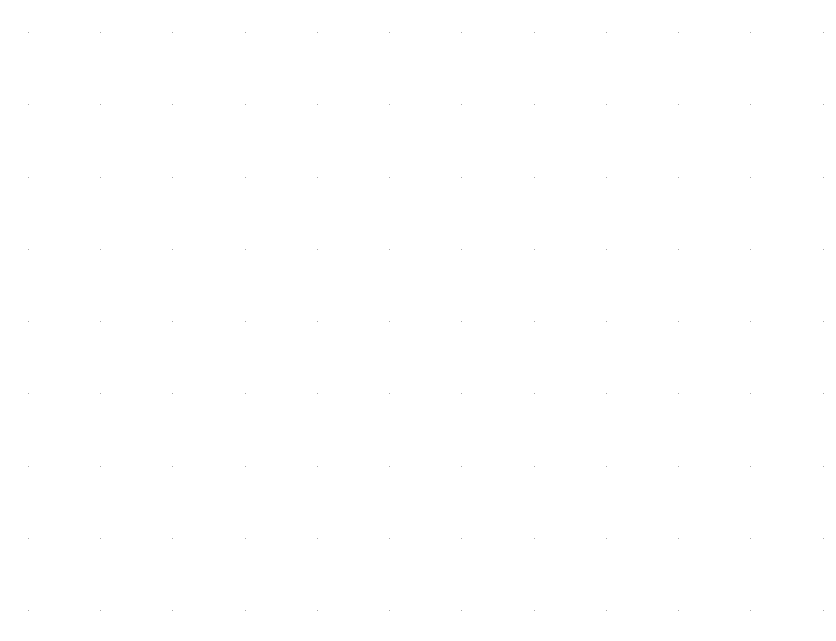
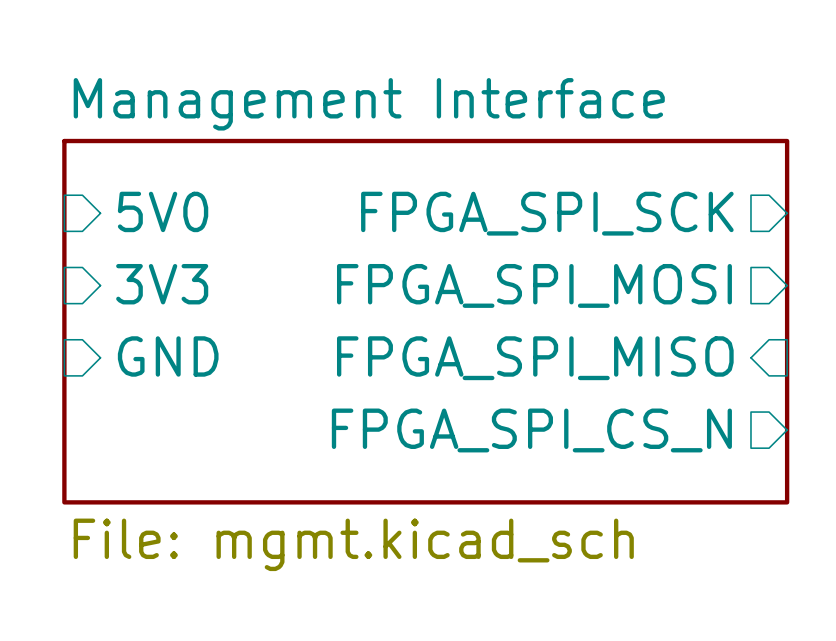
sheet pin: none -> 5V0 (163, 211)
sheet pin: none -> FPGA_SPI_SCK (547, 213)
sheet pin: none -> 3V3 (162, 284)
sheet pin: none -> FPGA_SPI_MOSI (534, 285)
sheet Management Interface: none -> File: mgmt.kicad_sch (425, 321)
sheet pin: none -> GND (168, 356)
sheet pin: none -> FPGA_SPI_MISO (535, 358)
sheet pin: none -> FPGA_SPI_CS_N (531, 430)

